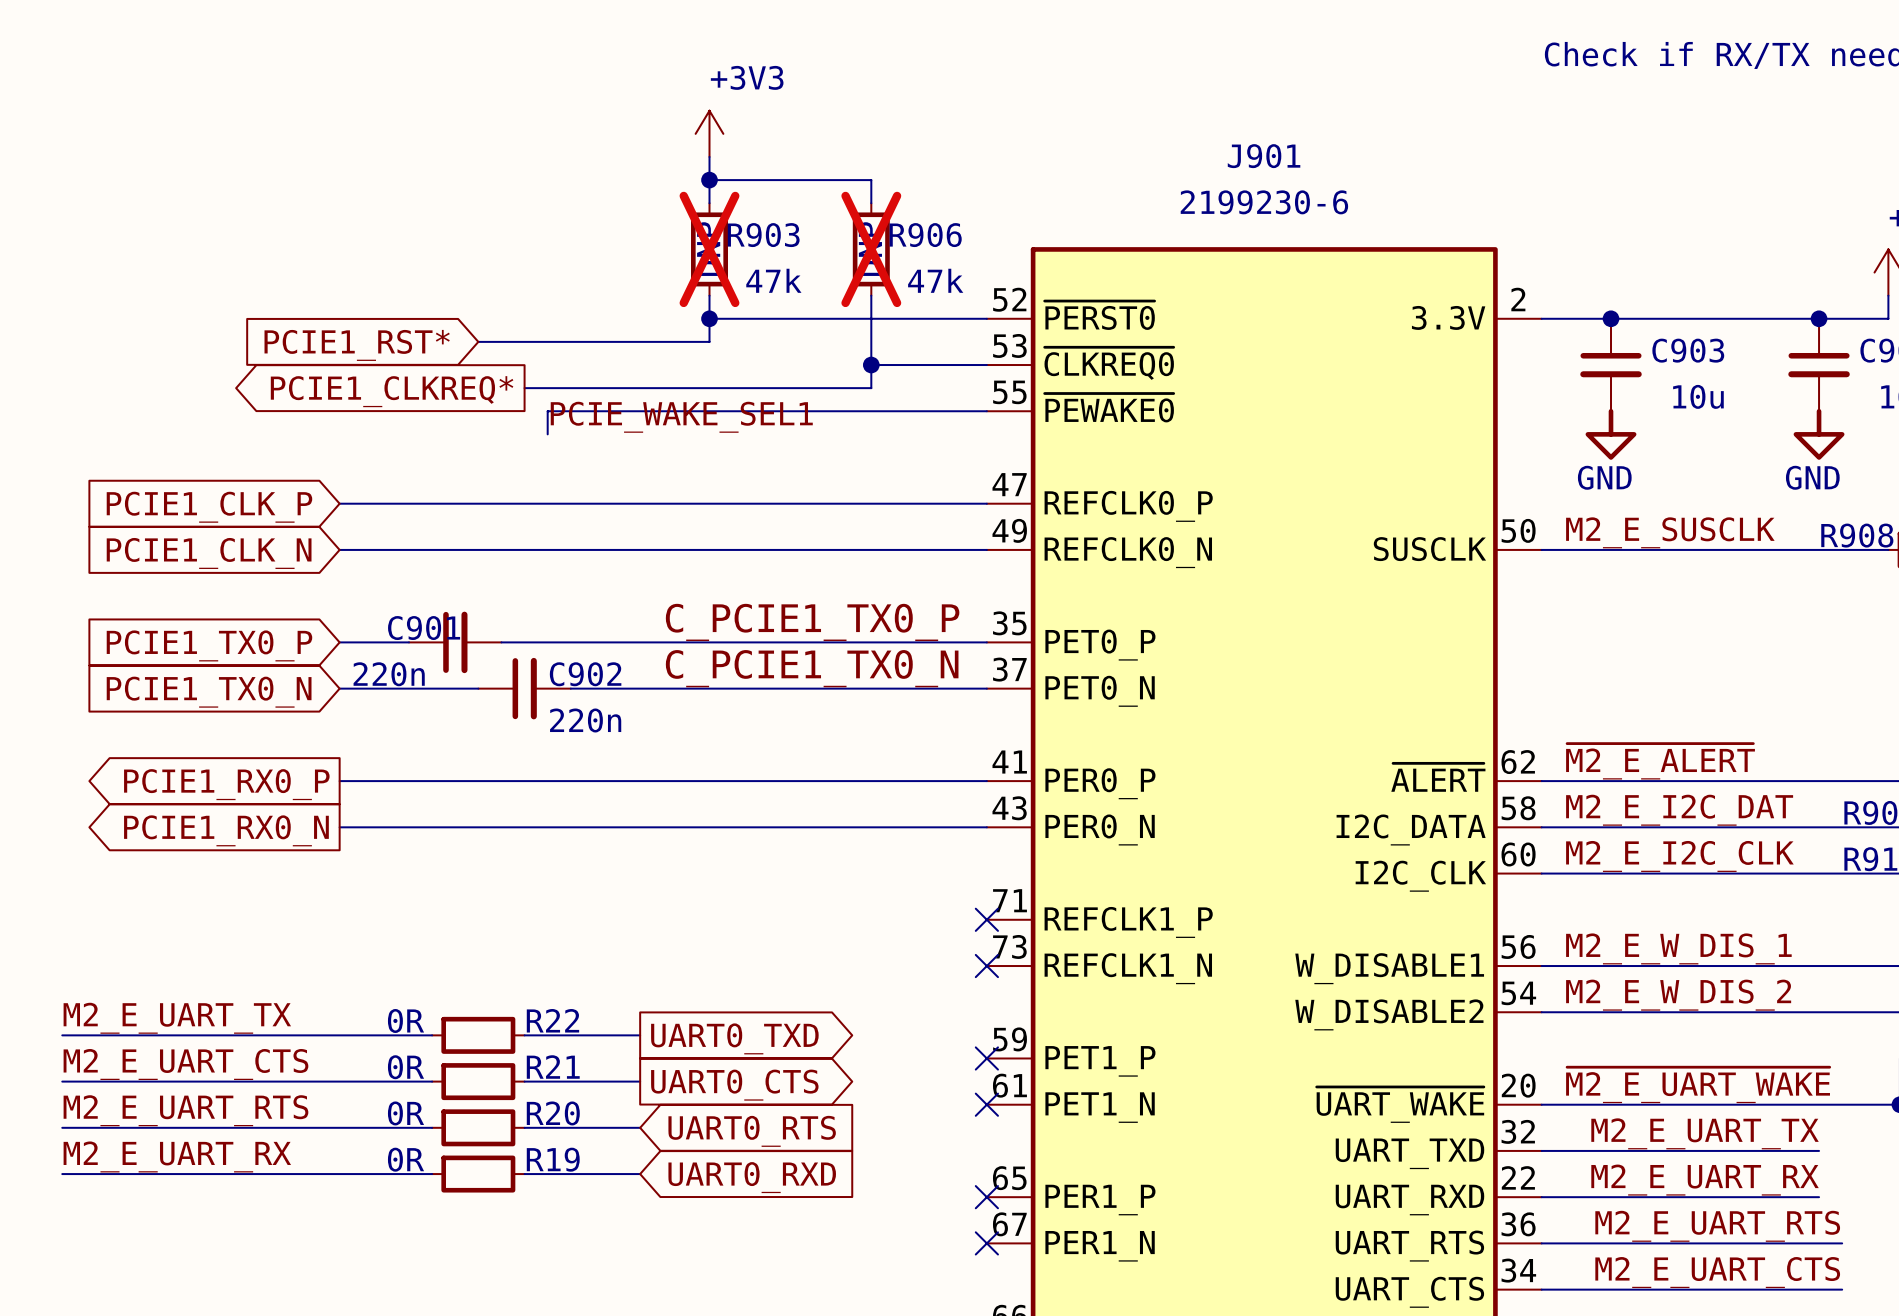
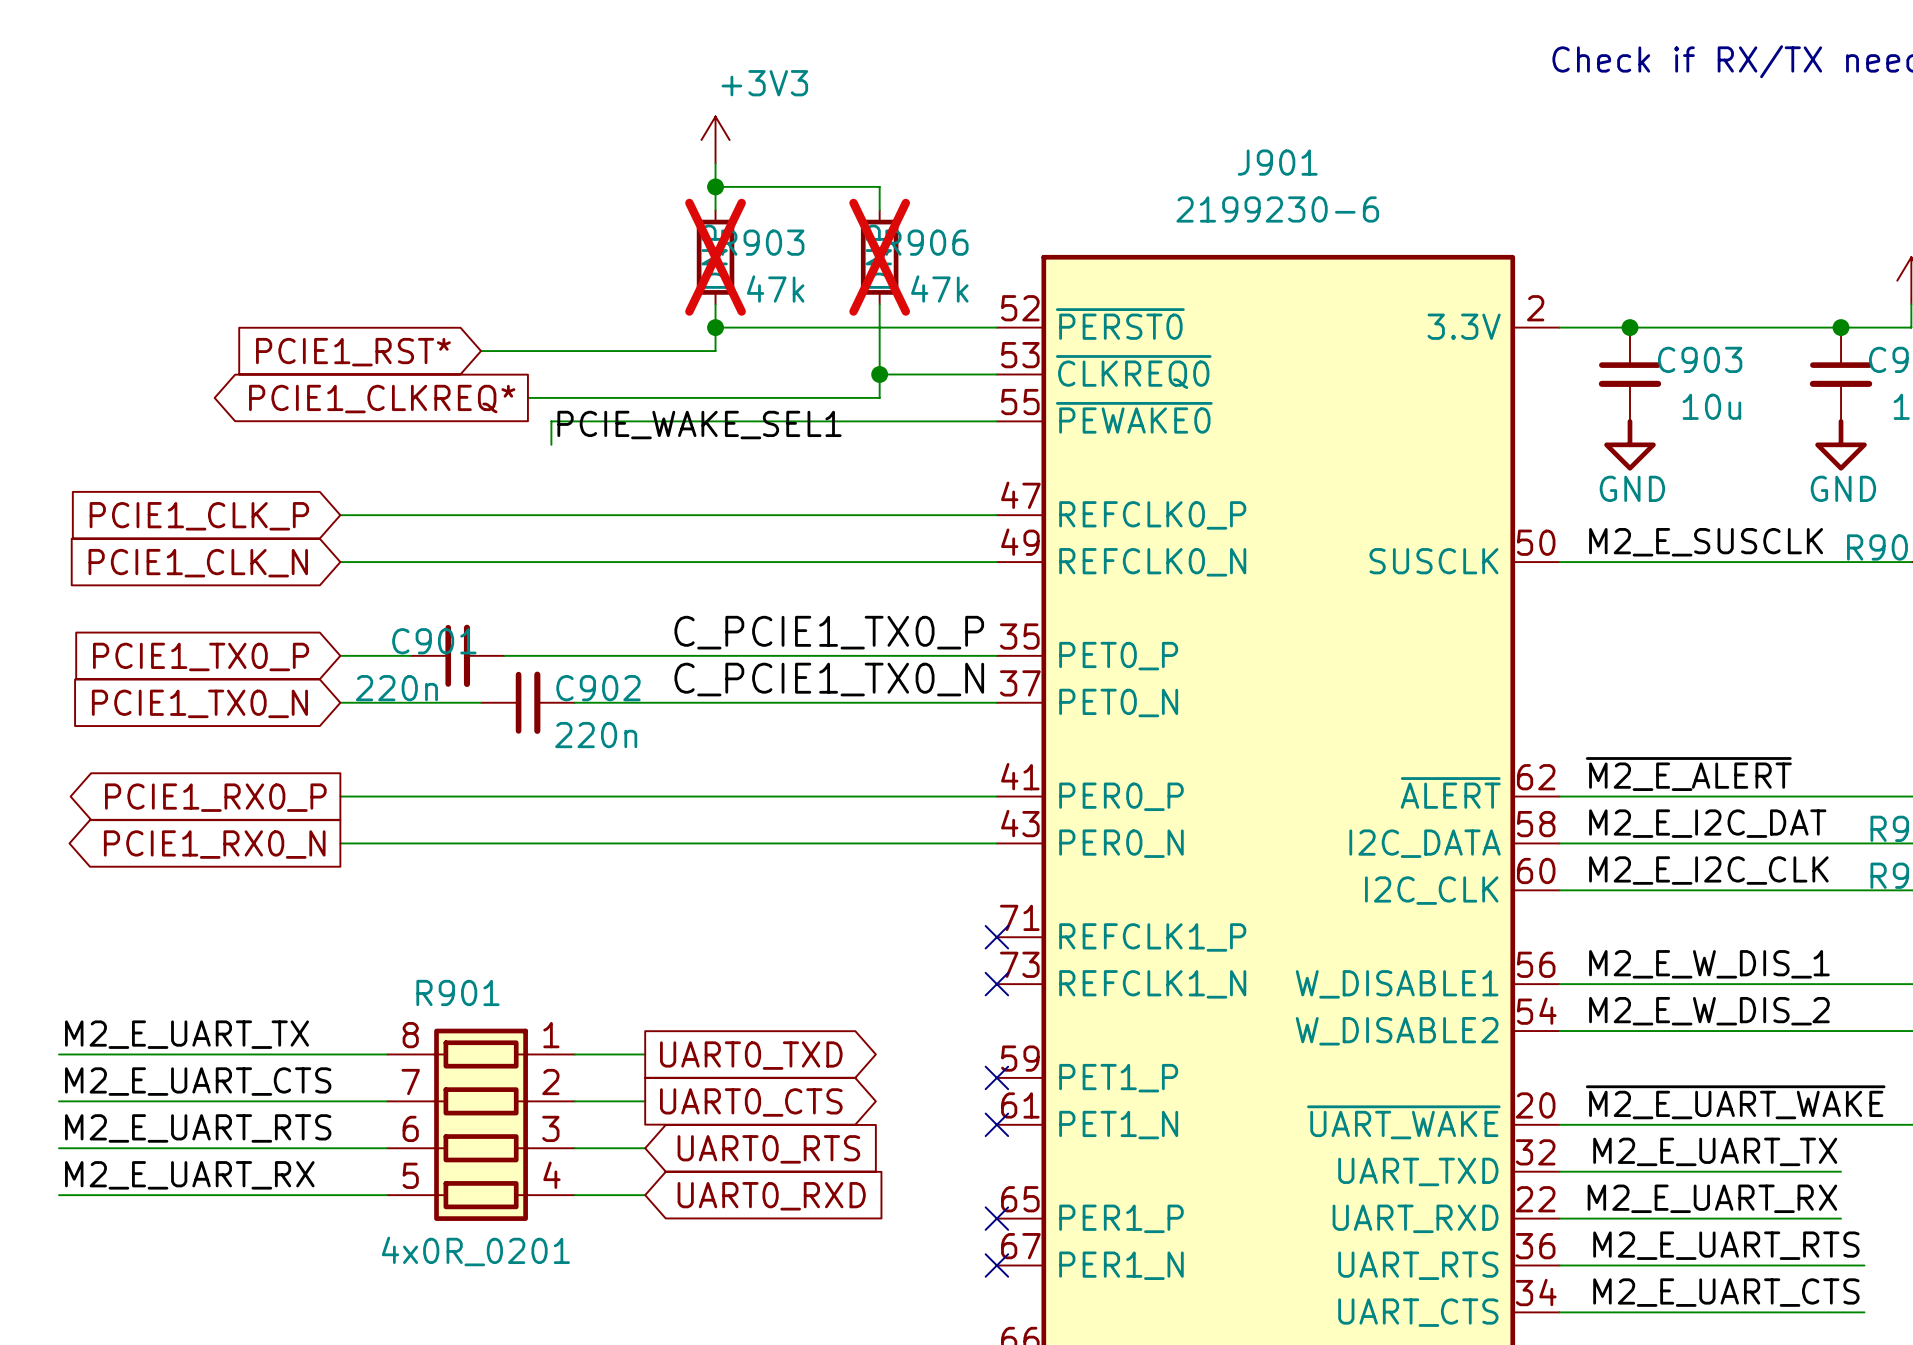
R22: (478, 1035) -> none
R21: (478, 1081) -> none
R901: none -> (481, 1124)
R20: (478, 1127) -> none
R19: (478, 1174) -> none

